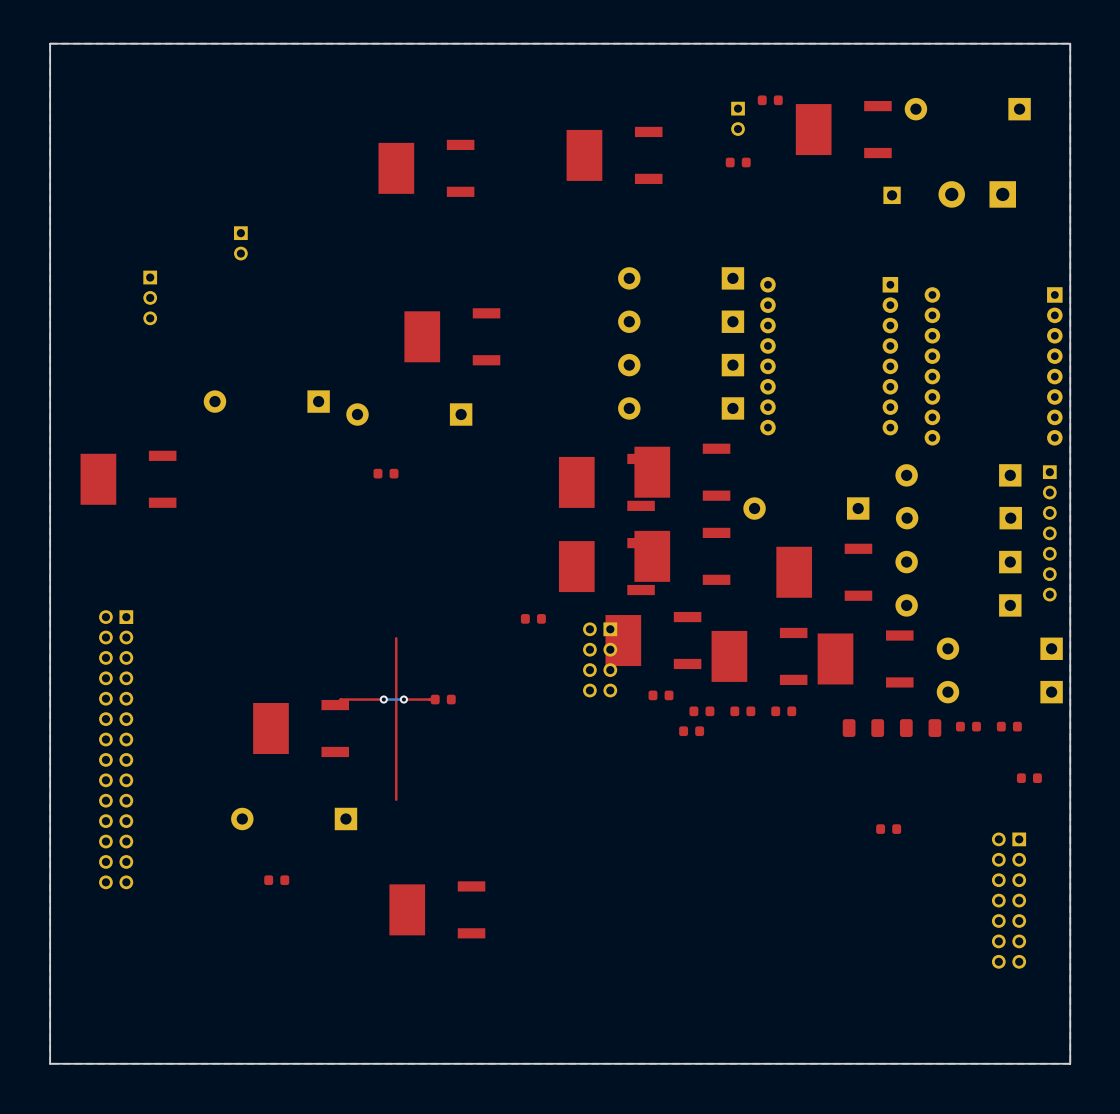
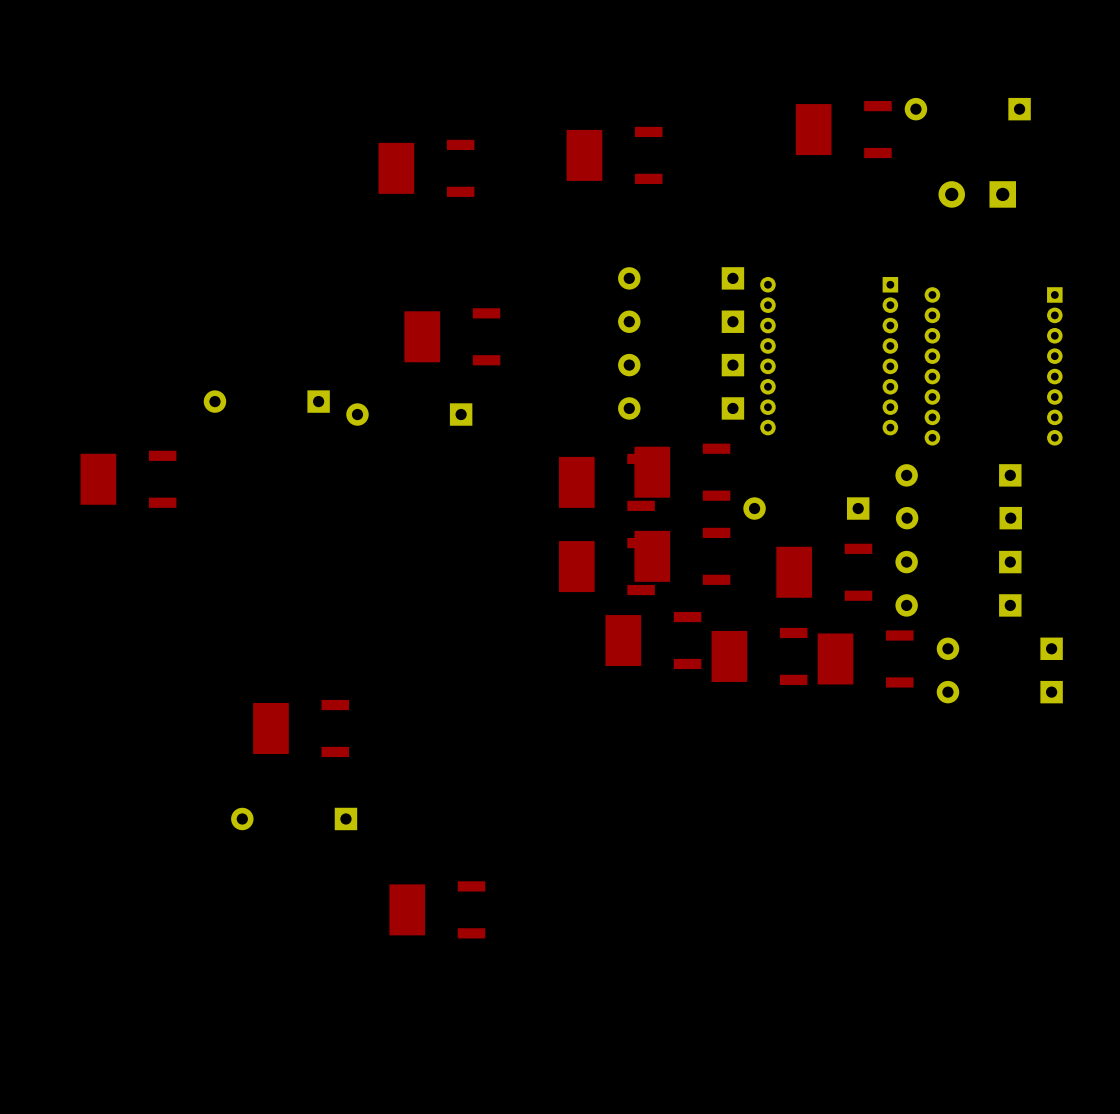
board edge: (1070, 43) (1070, 1063) (50, 1063) (50, 43) (1070, 43) -> none
part: (770, 100) -> none
part: (738, 118) -> none
part: (738, 162) -> none
part: (892, 195) -> none
part: (240, 243) -> none
part: (150, 297) -> none
part: (385, 473) -> none
part: (1049, 533) -> none
part: (533, 618) -> none
top track: (396, 638) (396, 799) -> none
part: (600, 659) -> none
part: (661, 695) -> none
top track: (383, 699) (340, 699) (335, 705) -> none
via: (383, 699) -> none
bottom track: (403, 699) (383, 699) -> none
via: (403, 699) -> none
top track: (435, 699) (403, 699) -> none
part: (443, 699) -> none
part: (701, 711) -> none
part: (742, 711) -> none
part: (783, 711) -> none
part: (968, 726) -> none
part: (1009, 726) -> none
part: (863, 728) -> none
part: (920, 728) -> none
part: (691, 731) -> none
part: (116, 749) -> none
part: (1029, 778) -> none
part: (888, 829) -> none
part: (276, 880) -> none
part: (1009, 900) -> none

